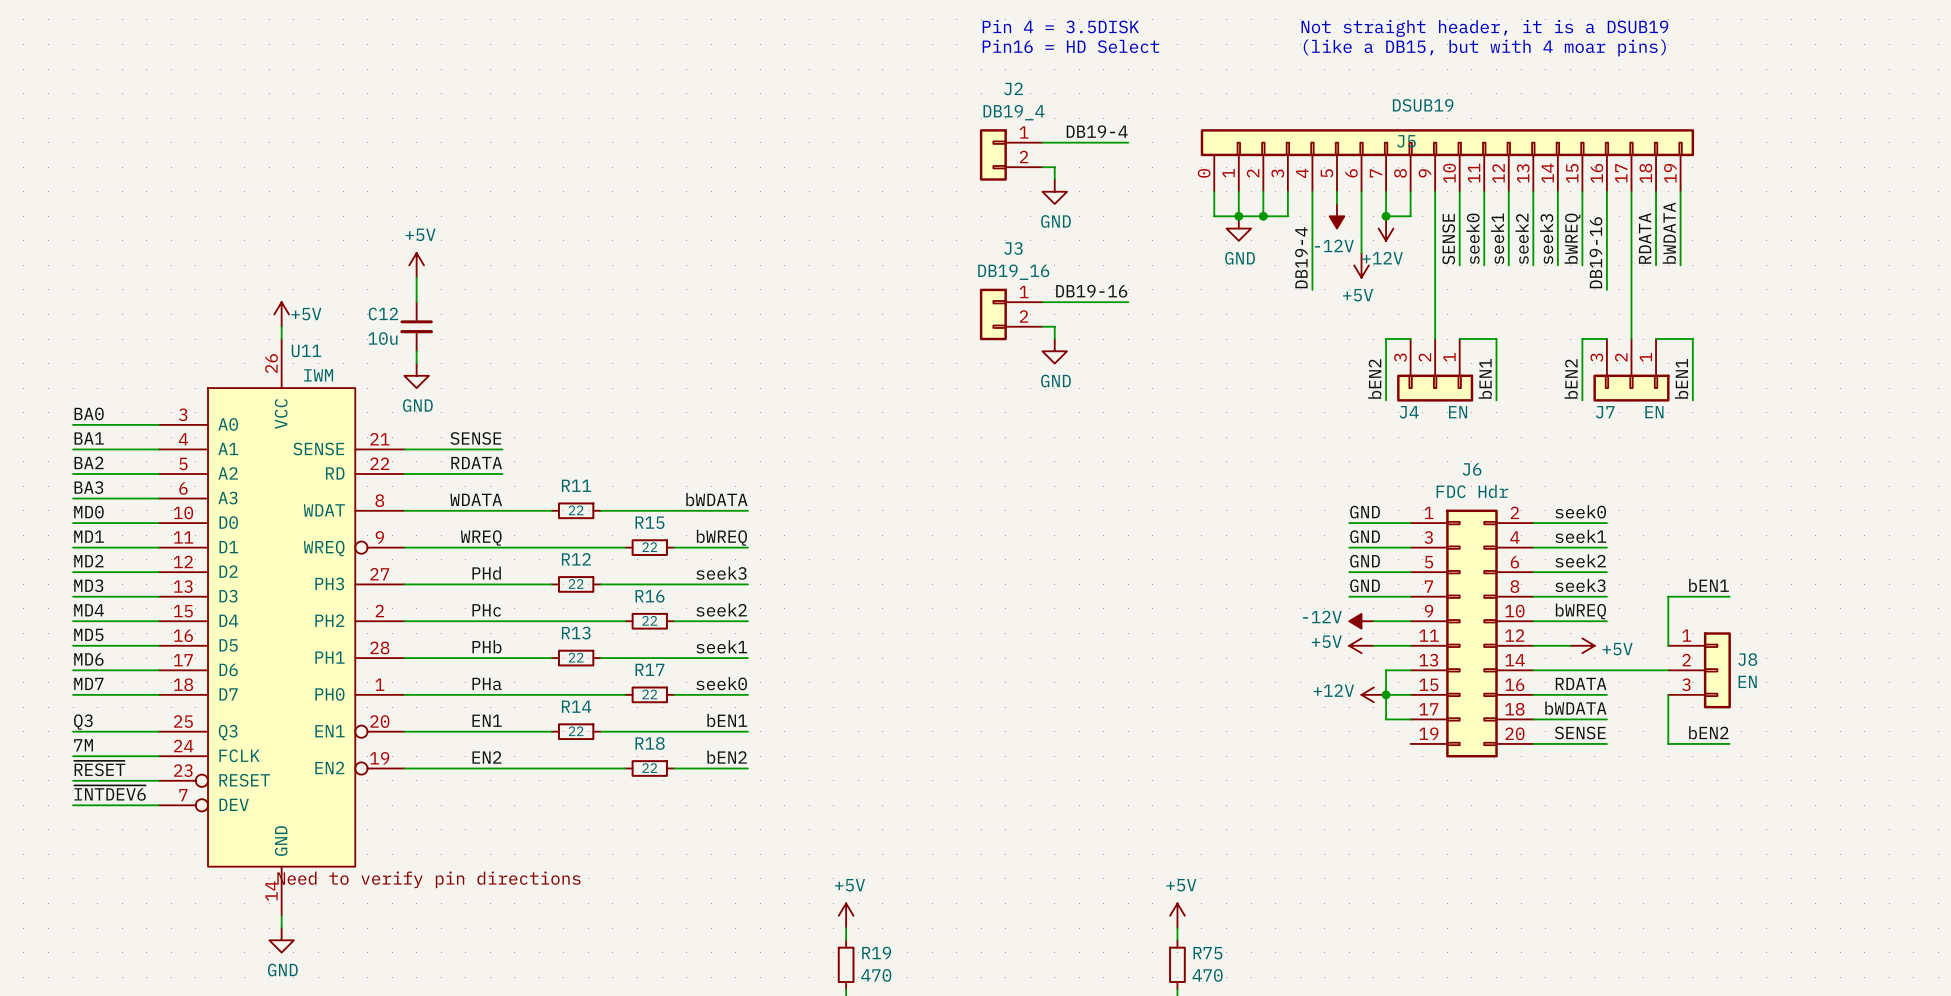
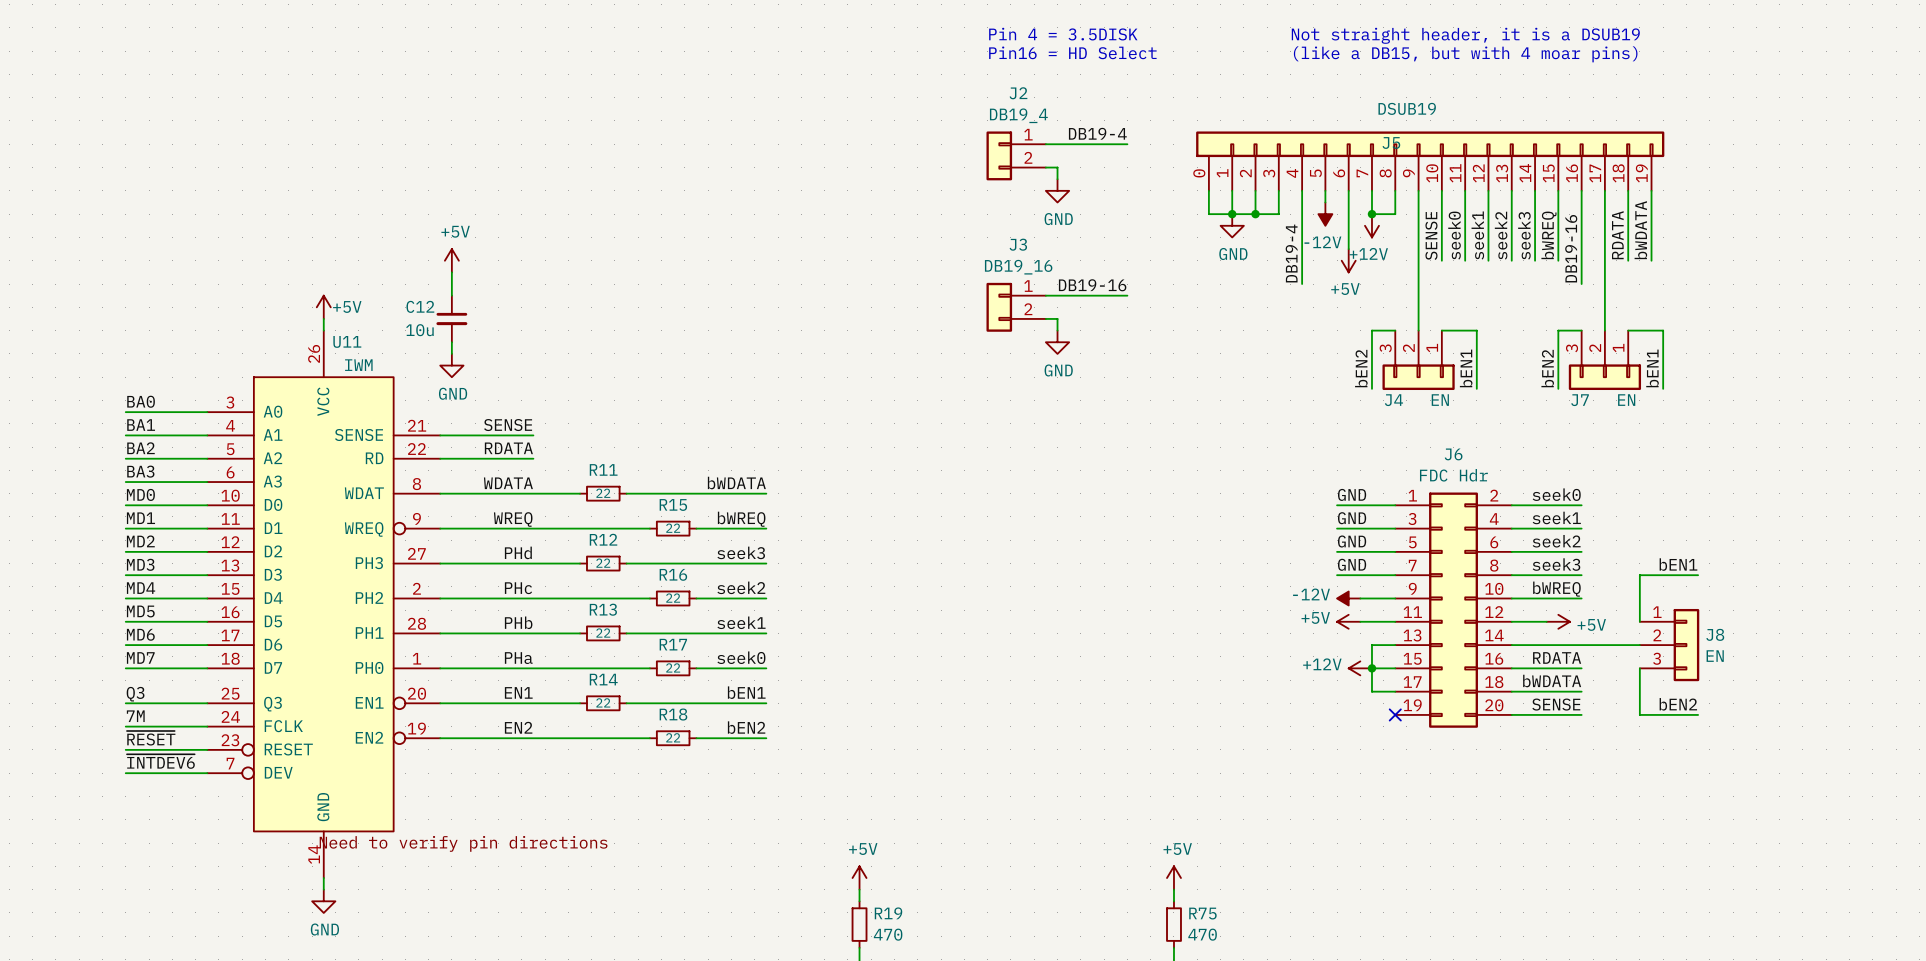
no-connect mark: none -> (1395, 714)

